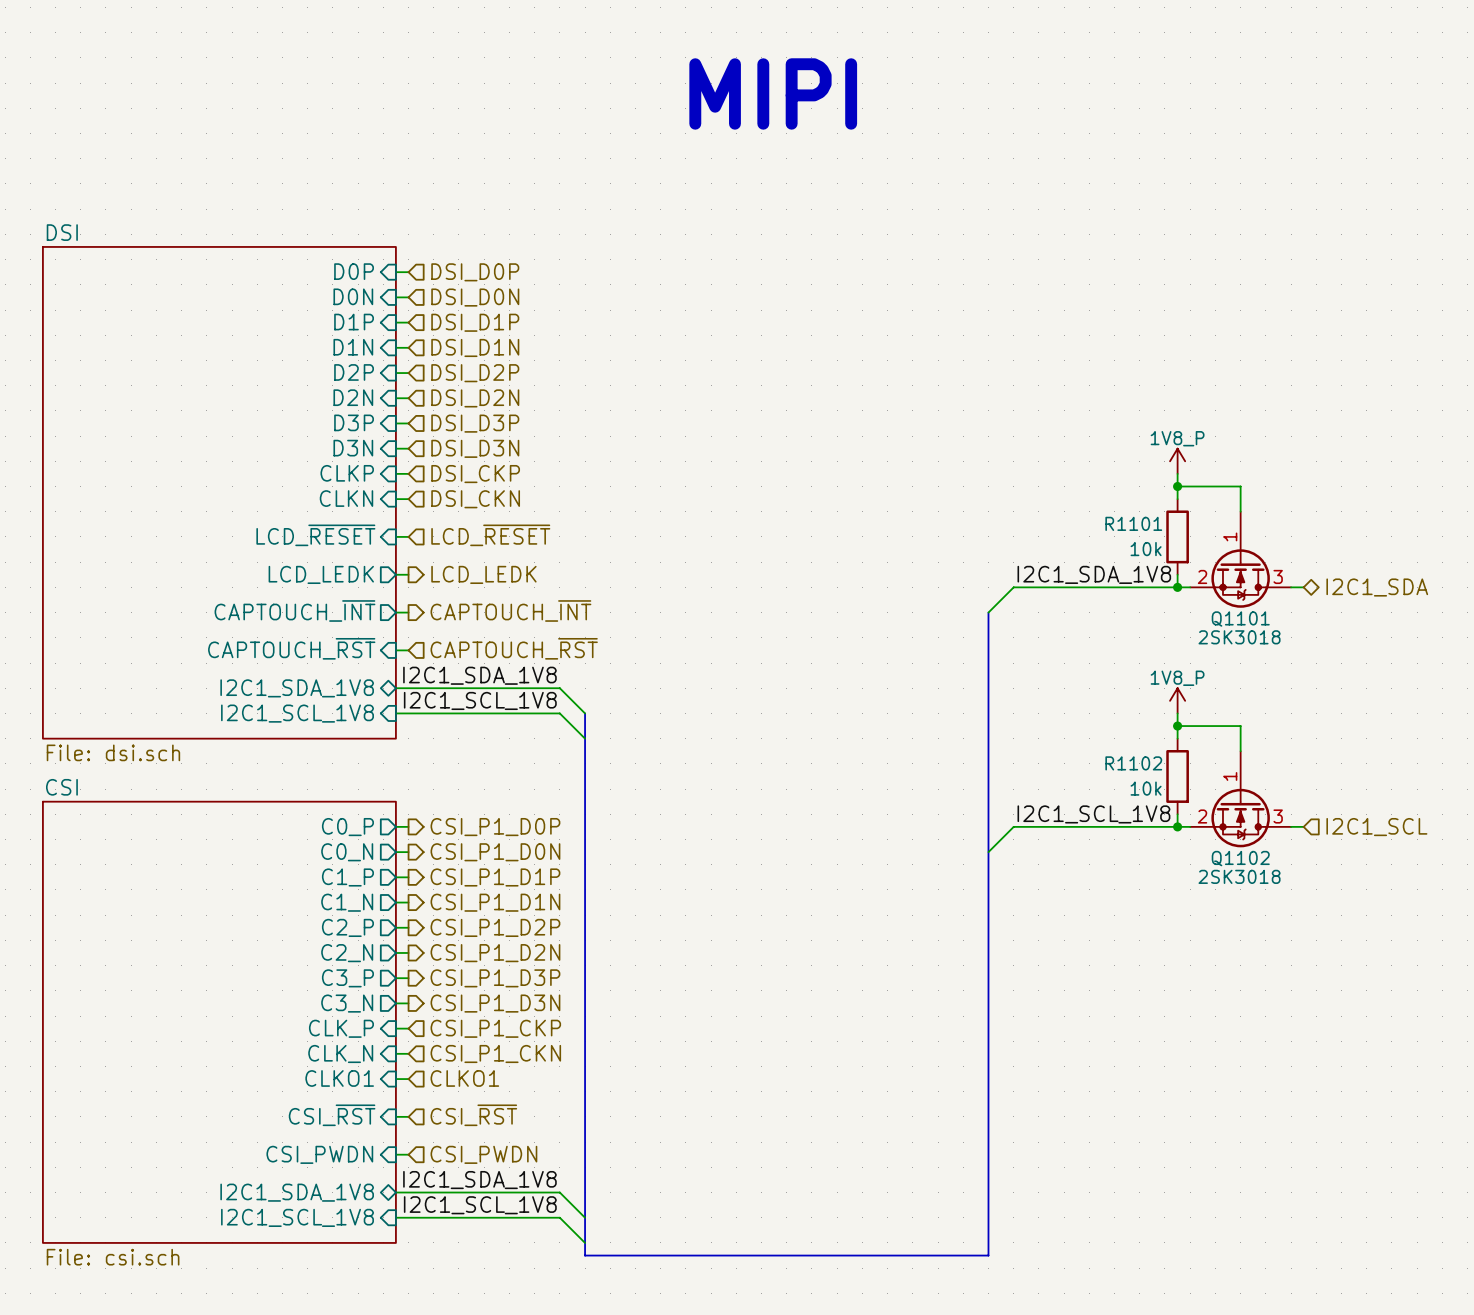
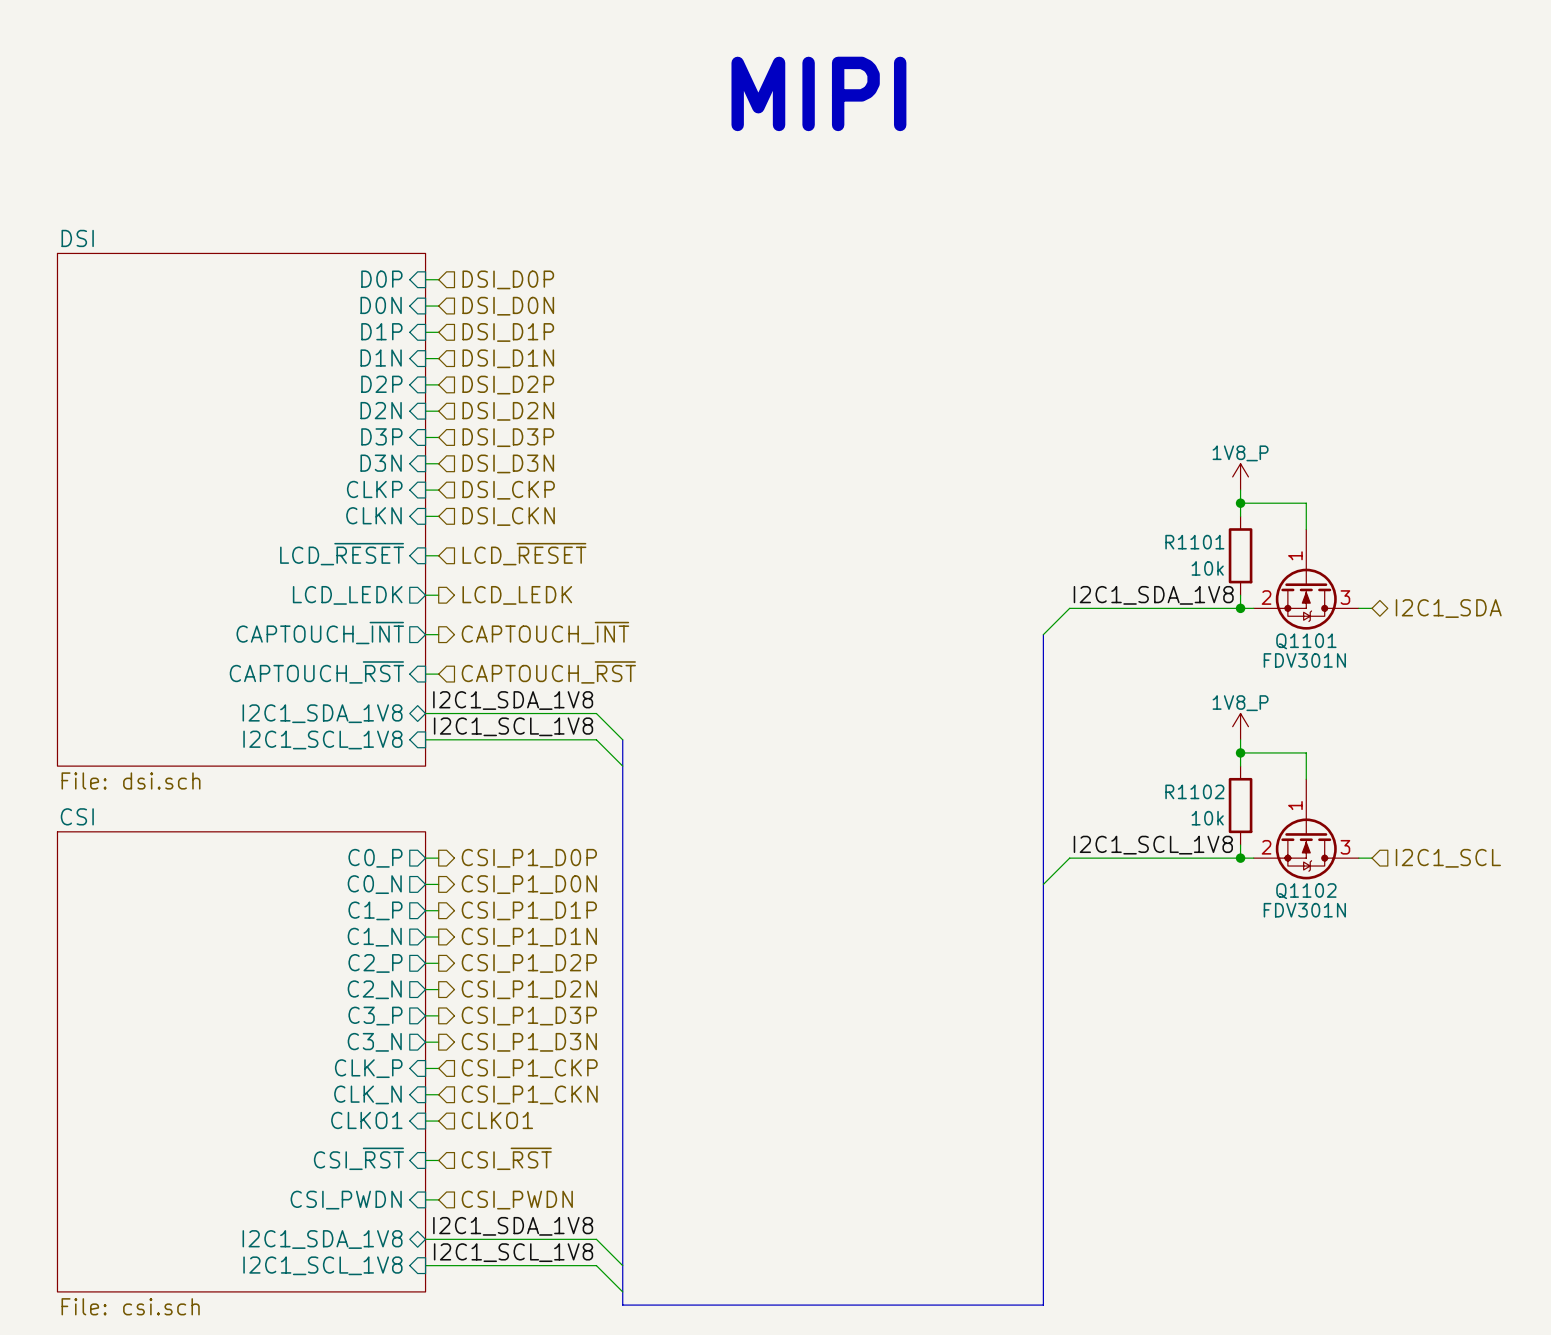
Q1101 value: 2SK3018 (1239, 637) -> FDV301N (1304, 660)
Q1102 value: 2SK3018 (1239, 876) -> FDV301N (1304, 910)

